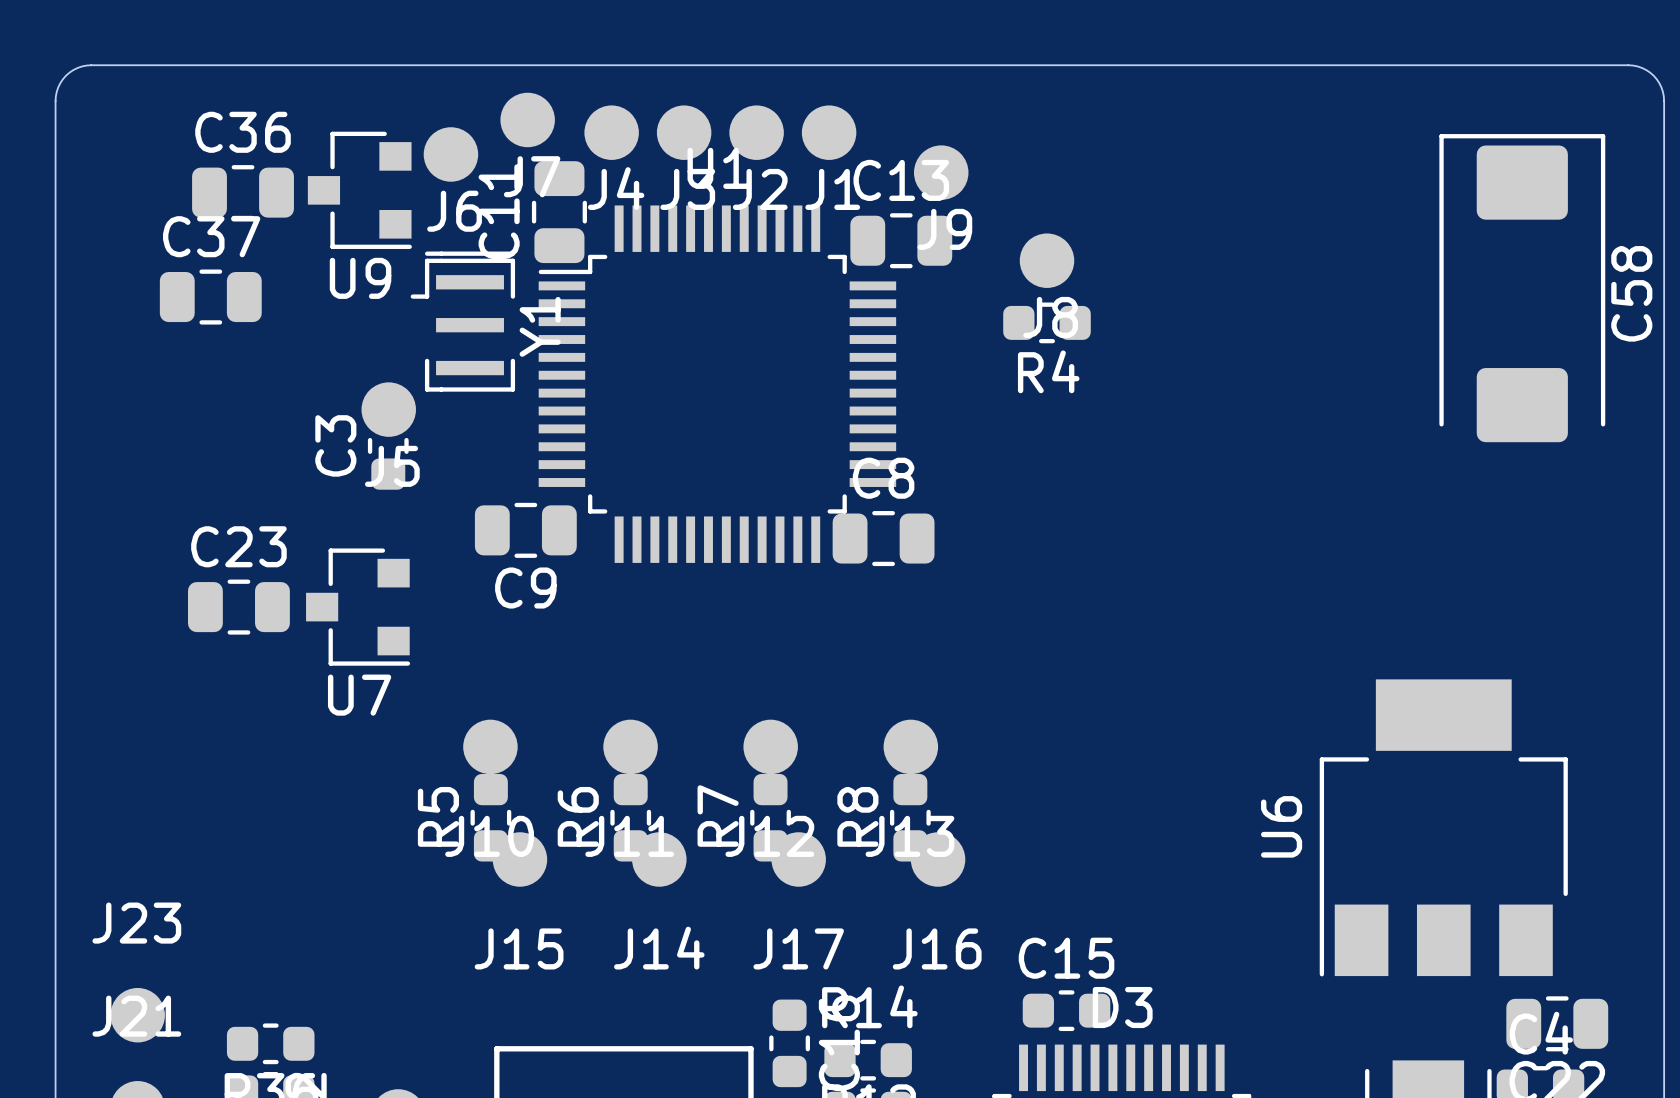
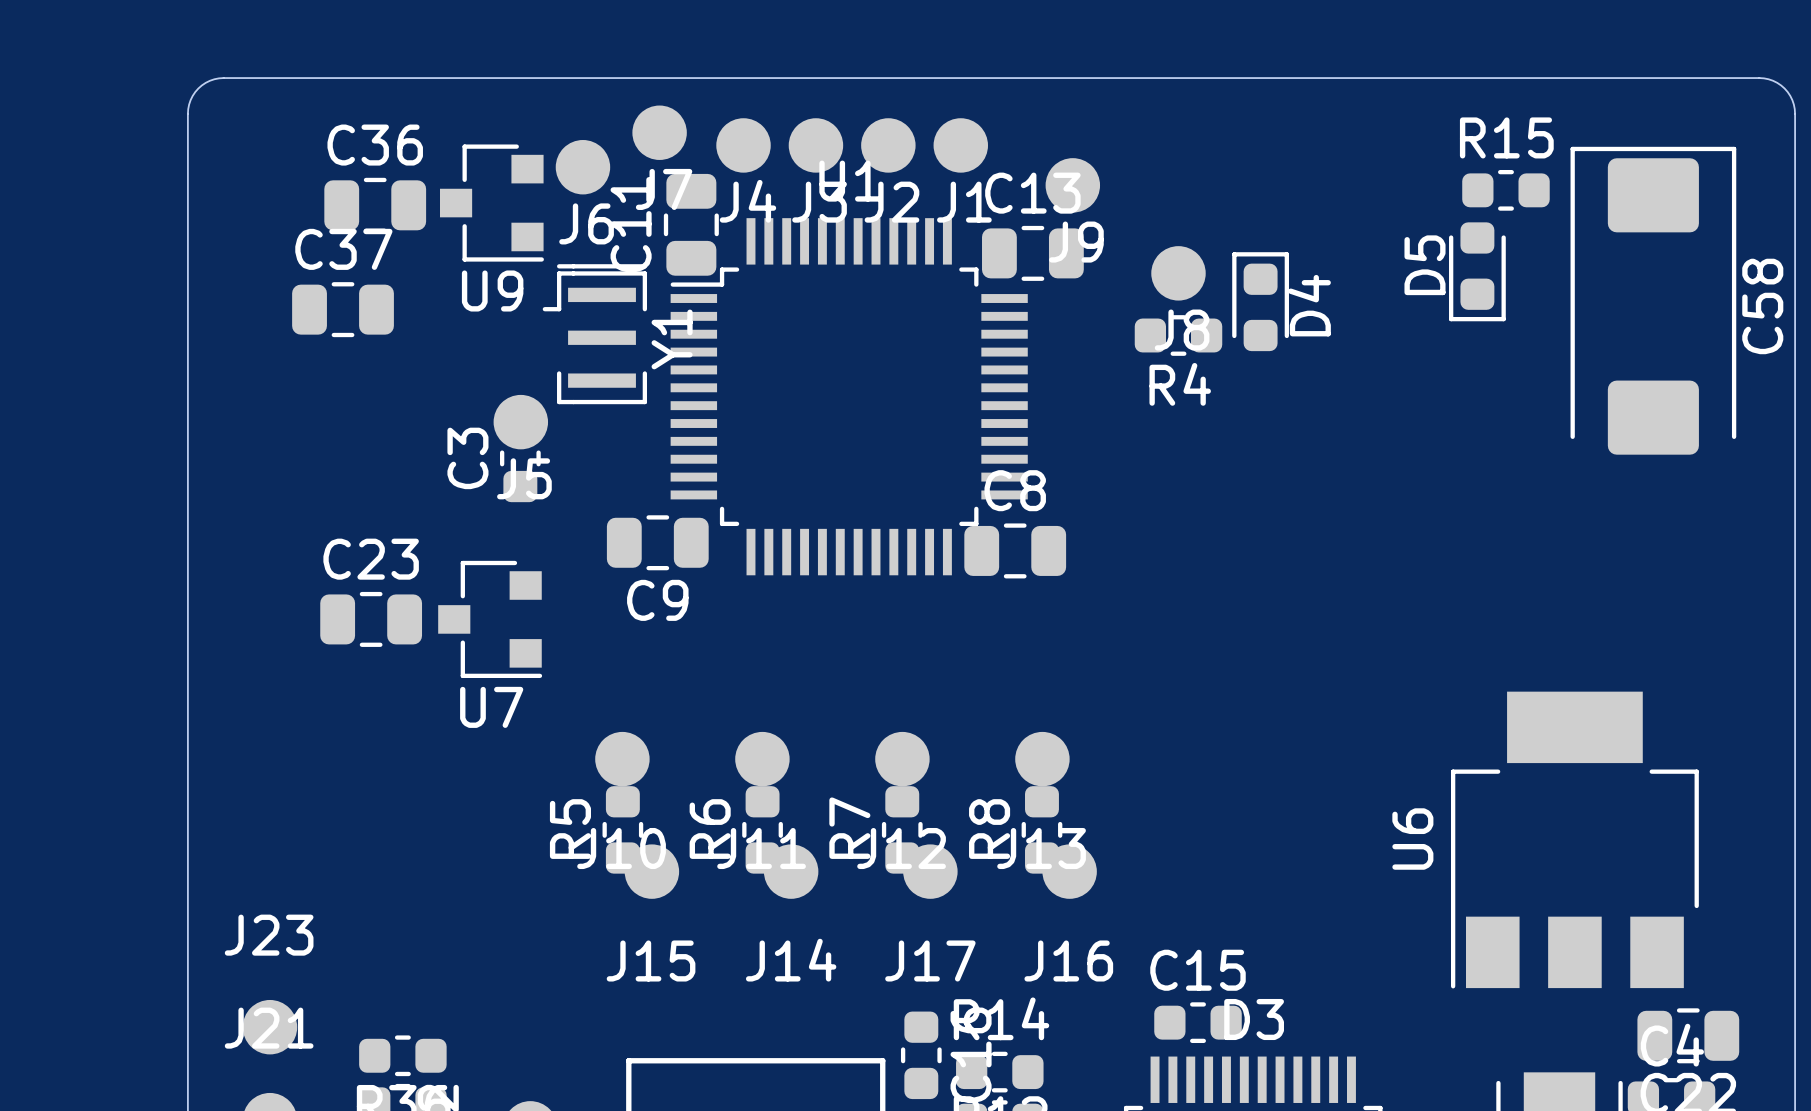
R15: none -> (1505, 190)
D5: none -> (1477, 271)
D4: none -> (1260, 301)

